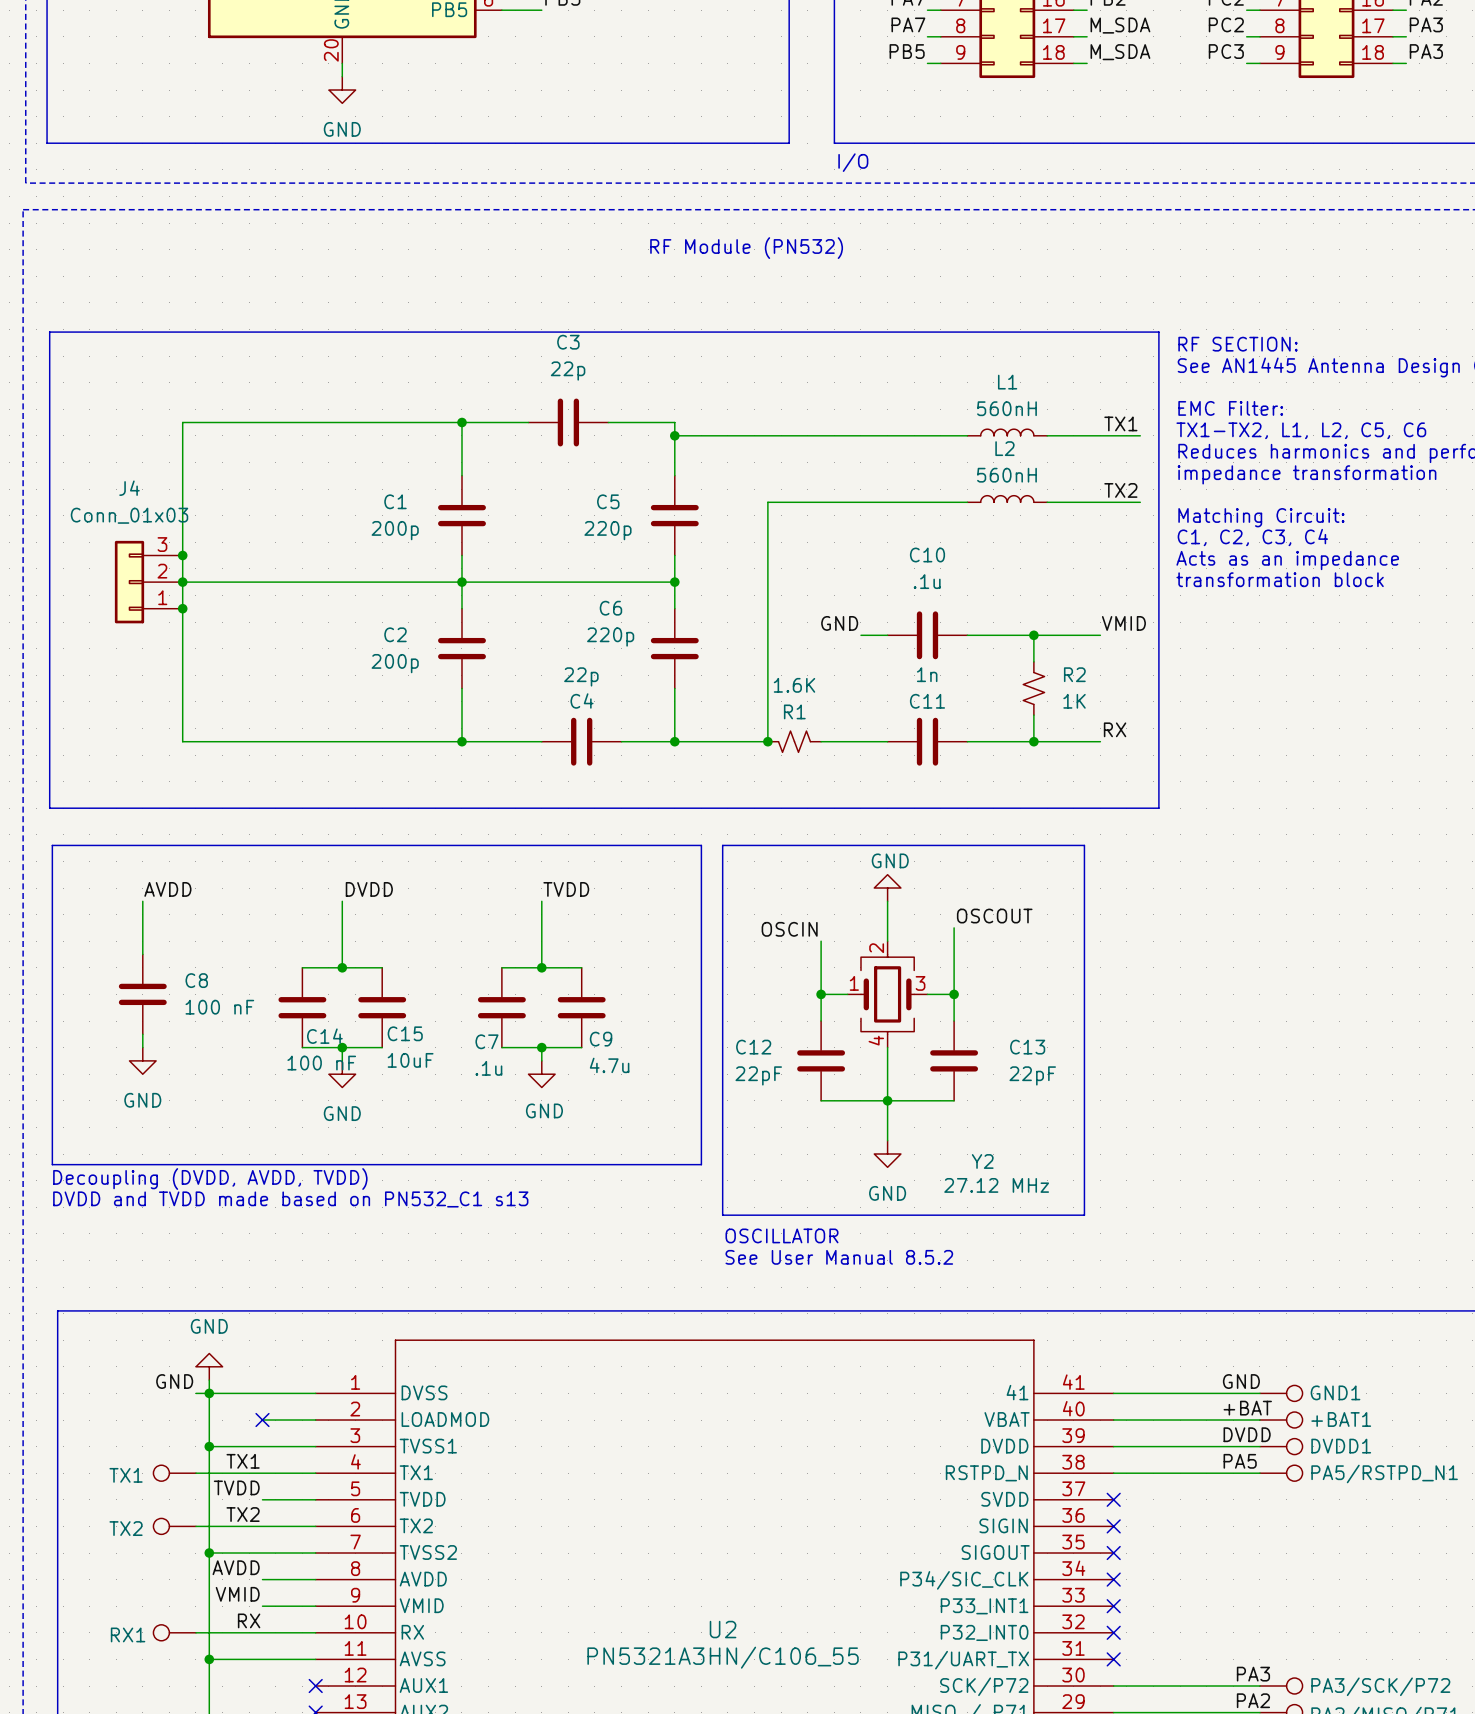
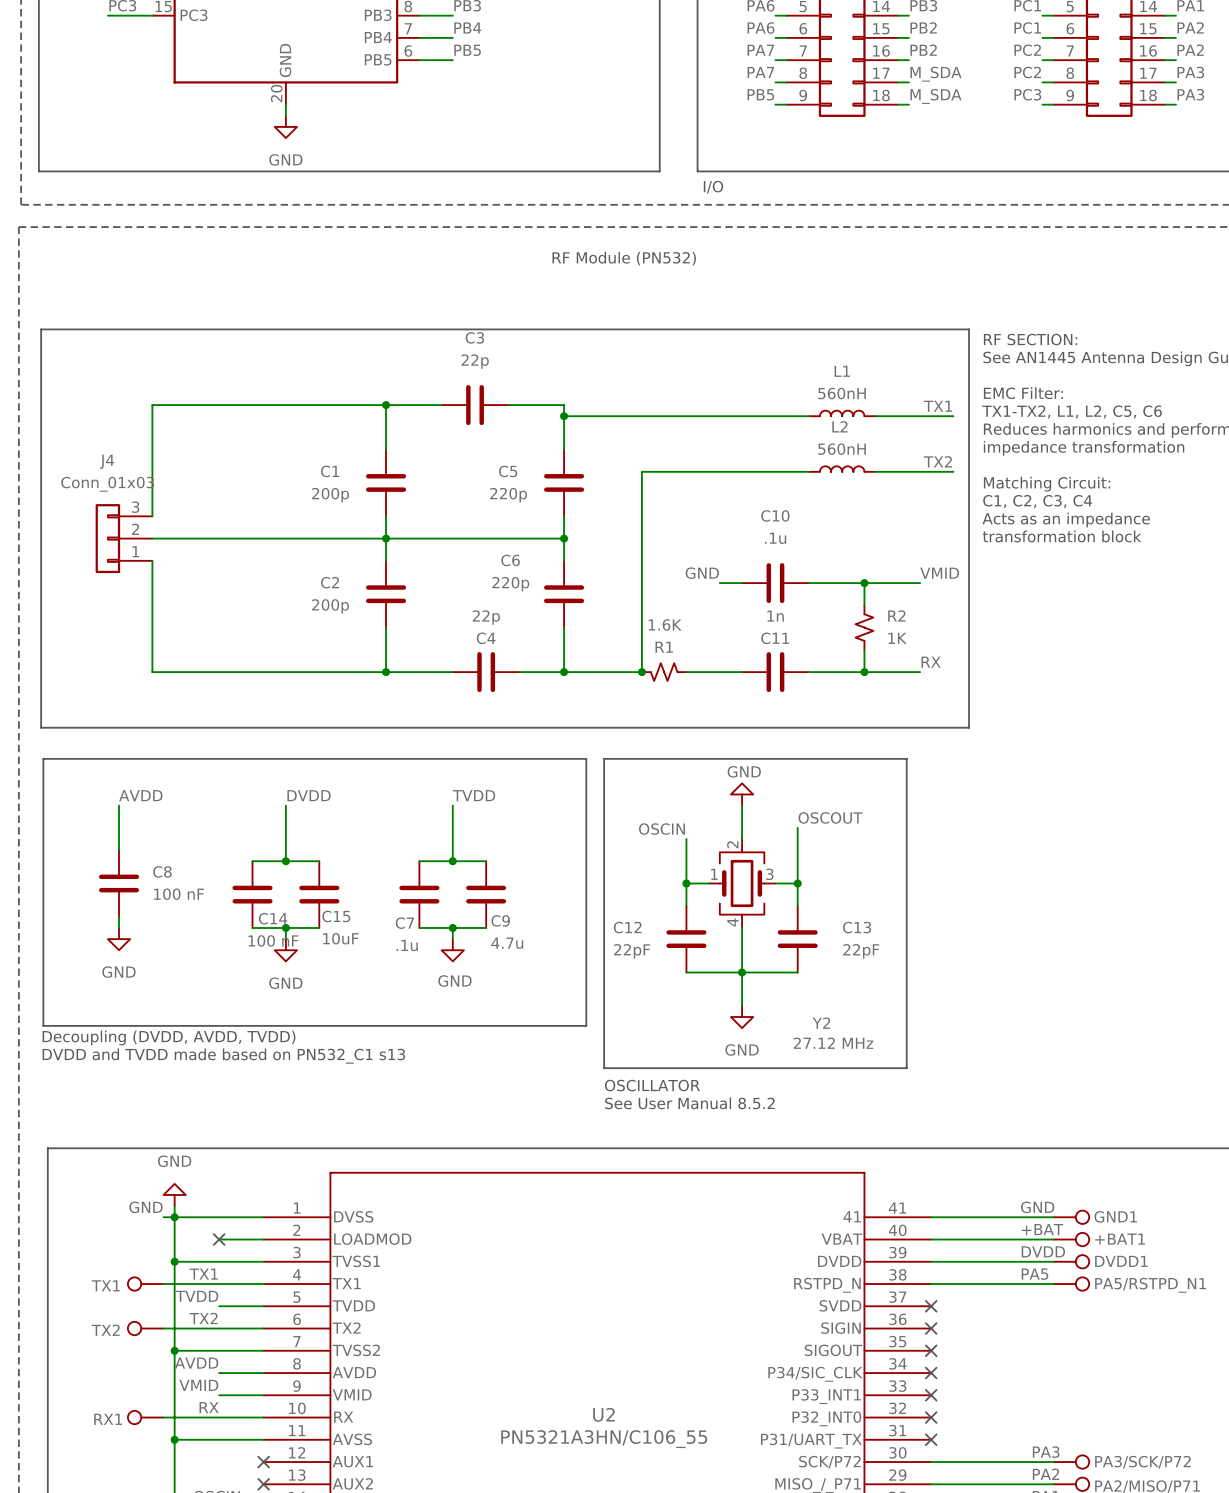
wire: (182, 555) (182, 608) -> none
junction: (182, 555) -> none
junction: (182, 582) -> none
junction: (182, 608) -> none

